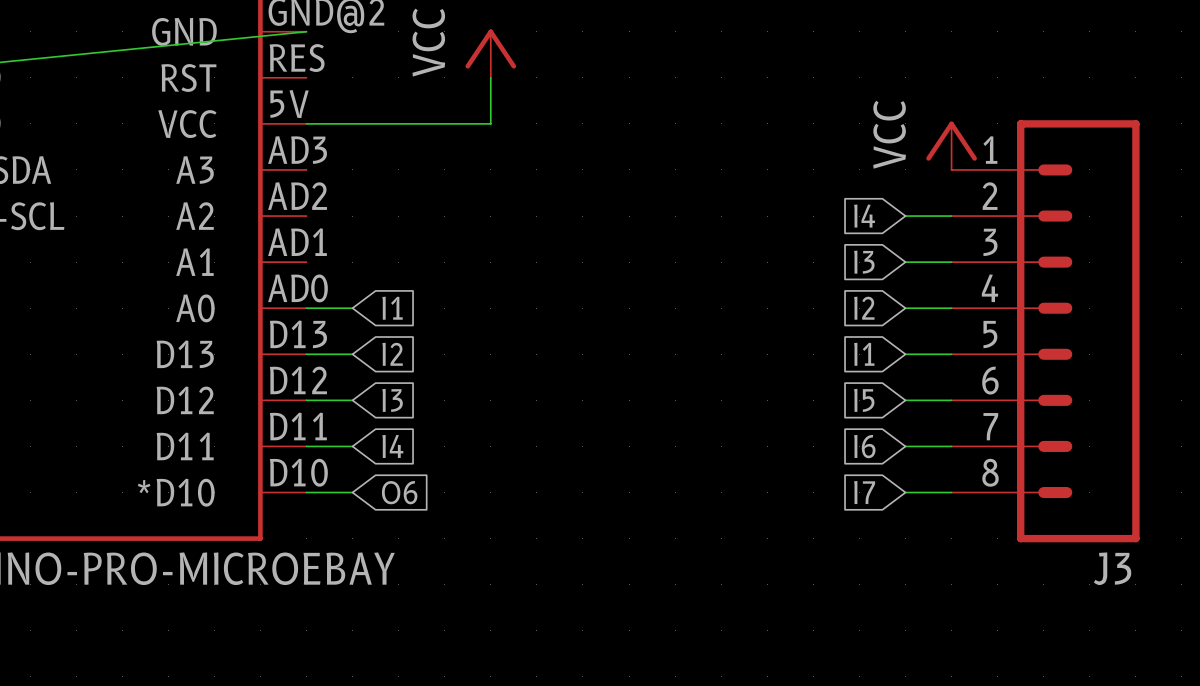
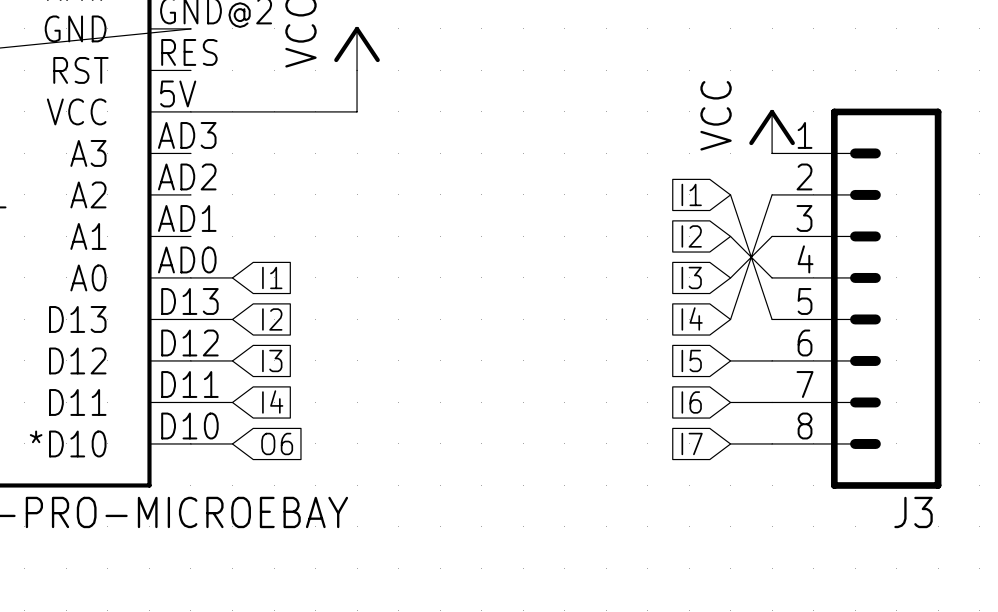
global label: I4 (864, 216) -> I1 (691, 194)
wire: (905, 216) (951, 216) -> (730, 194) (772, 319)
global label: I3 (864, 262) -> I2 (691, 236)
wire: (905, 262) (951, 262) -> (730, 236) (772, 277)
global label: I2 (864, 308) -> I3 (691, 277)
wire: (905, 308) (951, 308) -> (730, 277) (772, 236)
global label: I1 (864, 354) -> I4 (692, 318)
wire: (905, 354) (951, 354) -> (730, 319) (772, 194)

